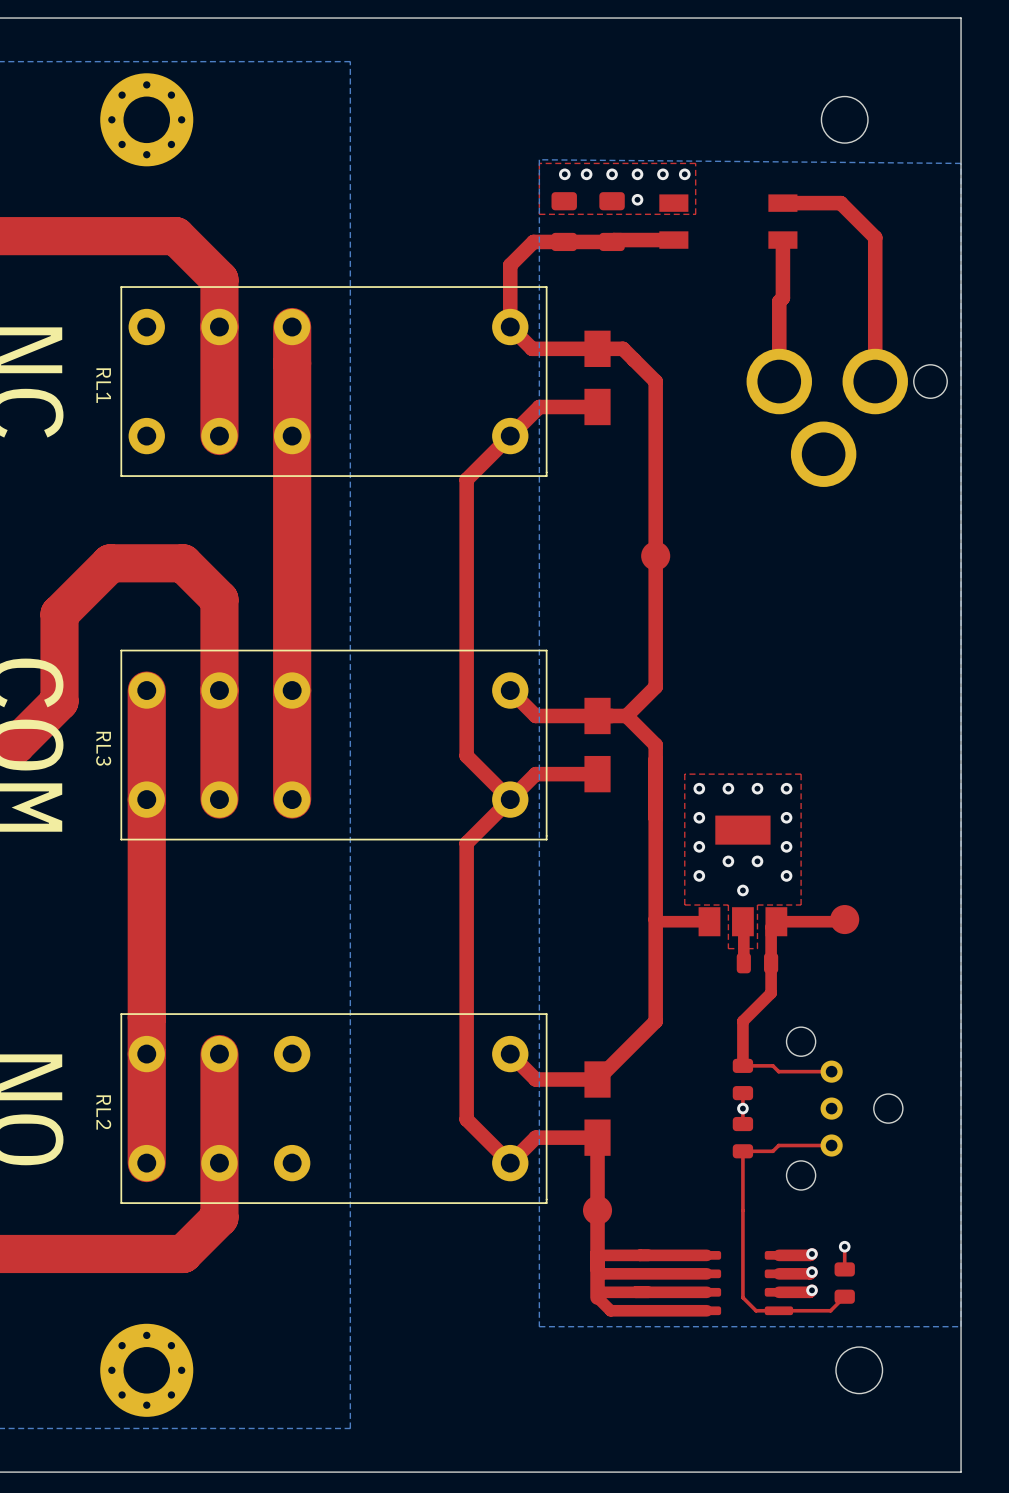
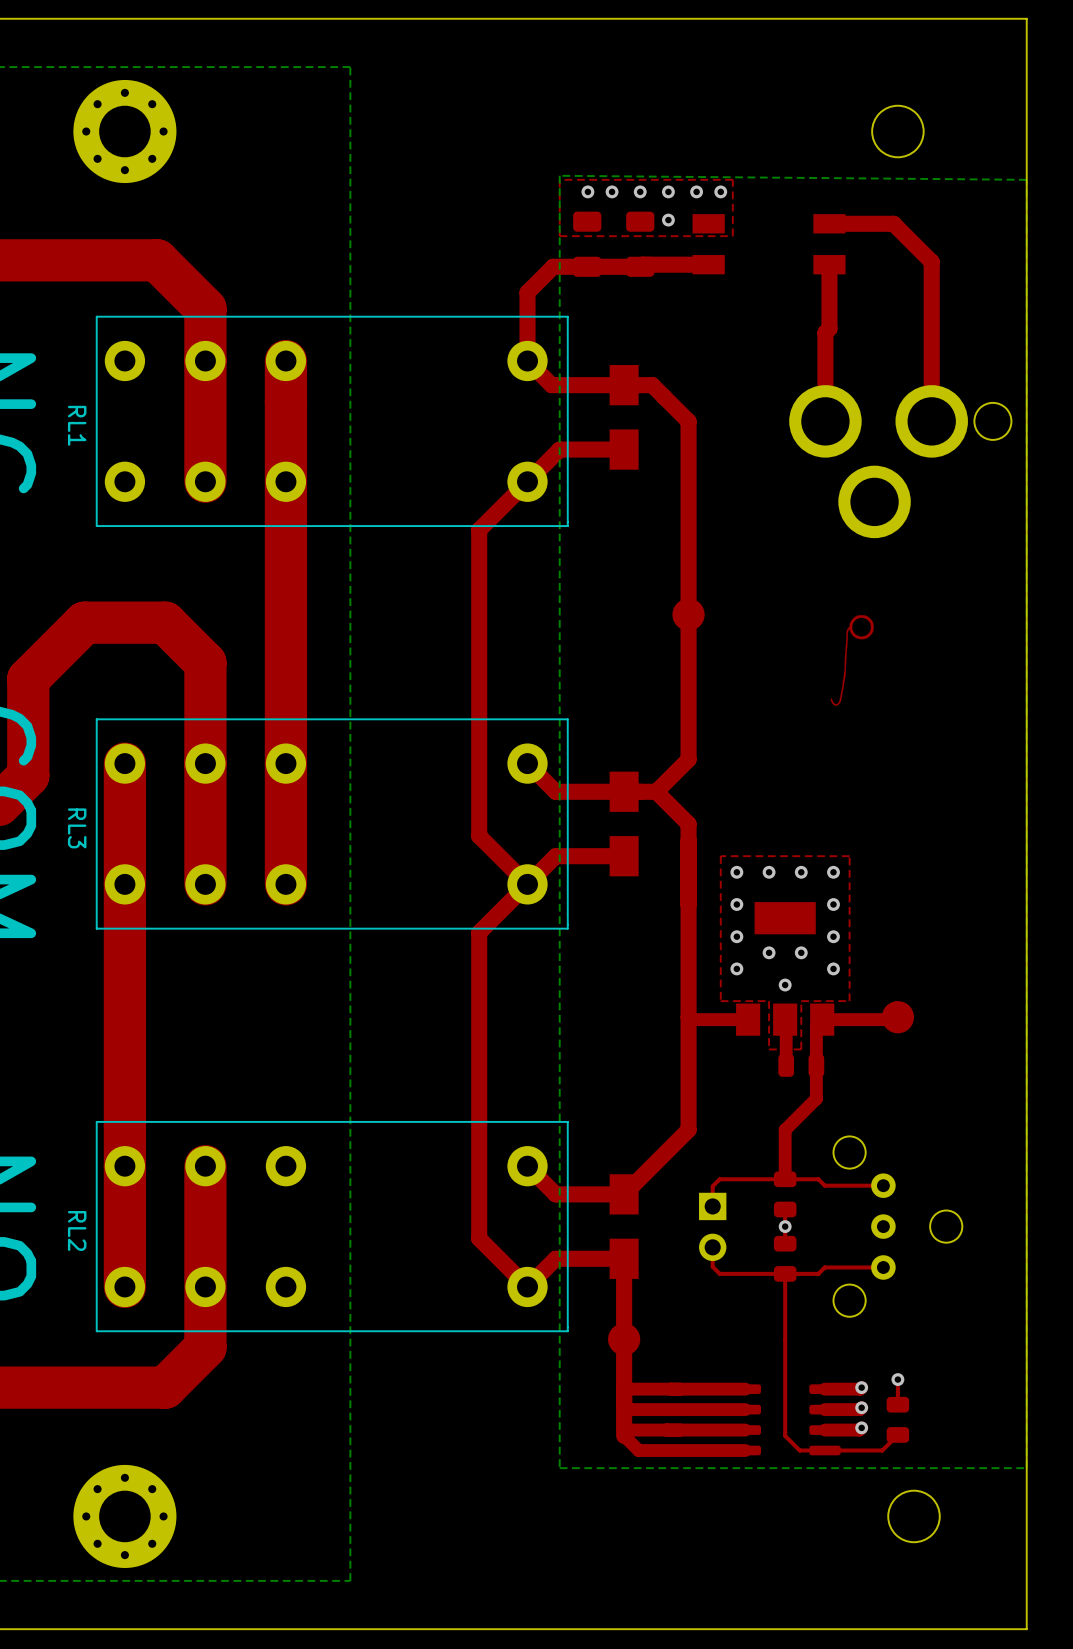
drawing: none -> [830, 615, 874, 706]
top track: none -> (785, 1179) (719, 1179) (712, 1186) (712, 1206)
part: none -> (712, 1226)
top track: none -> (712, 1247) (712, 1266) (719, 1273) (785, 1273)

